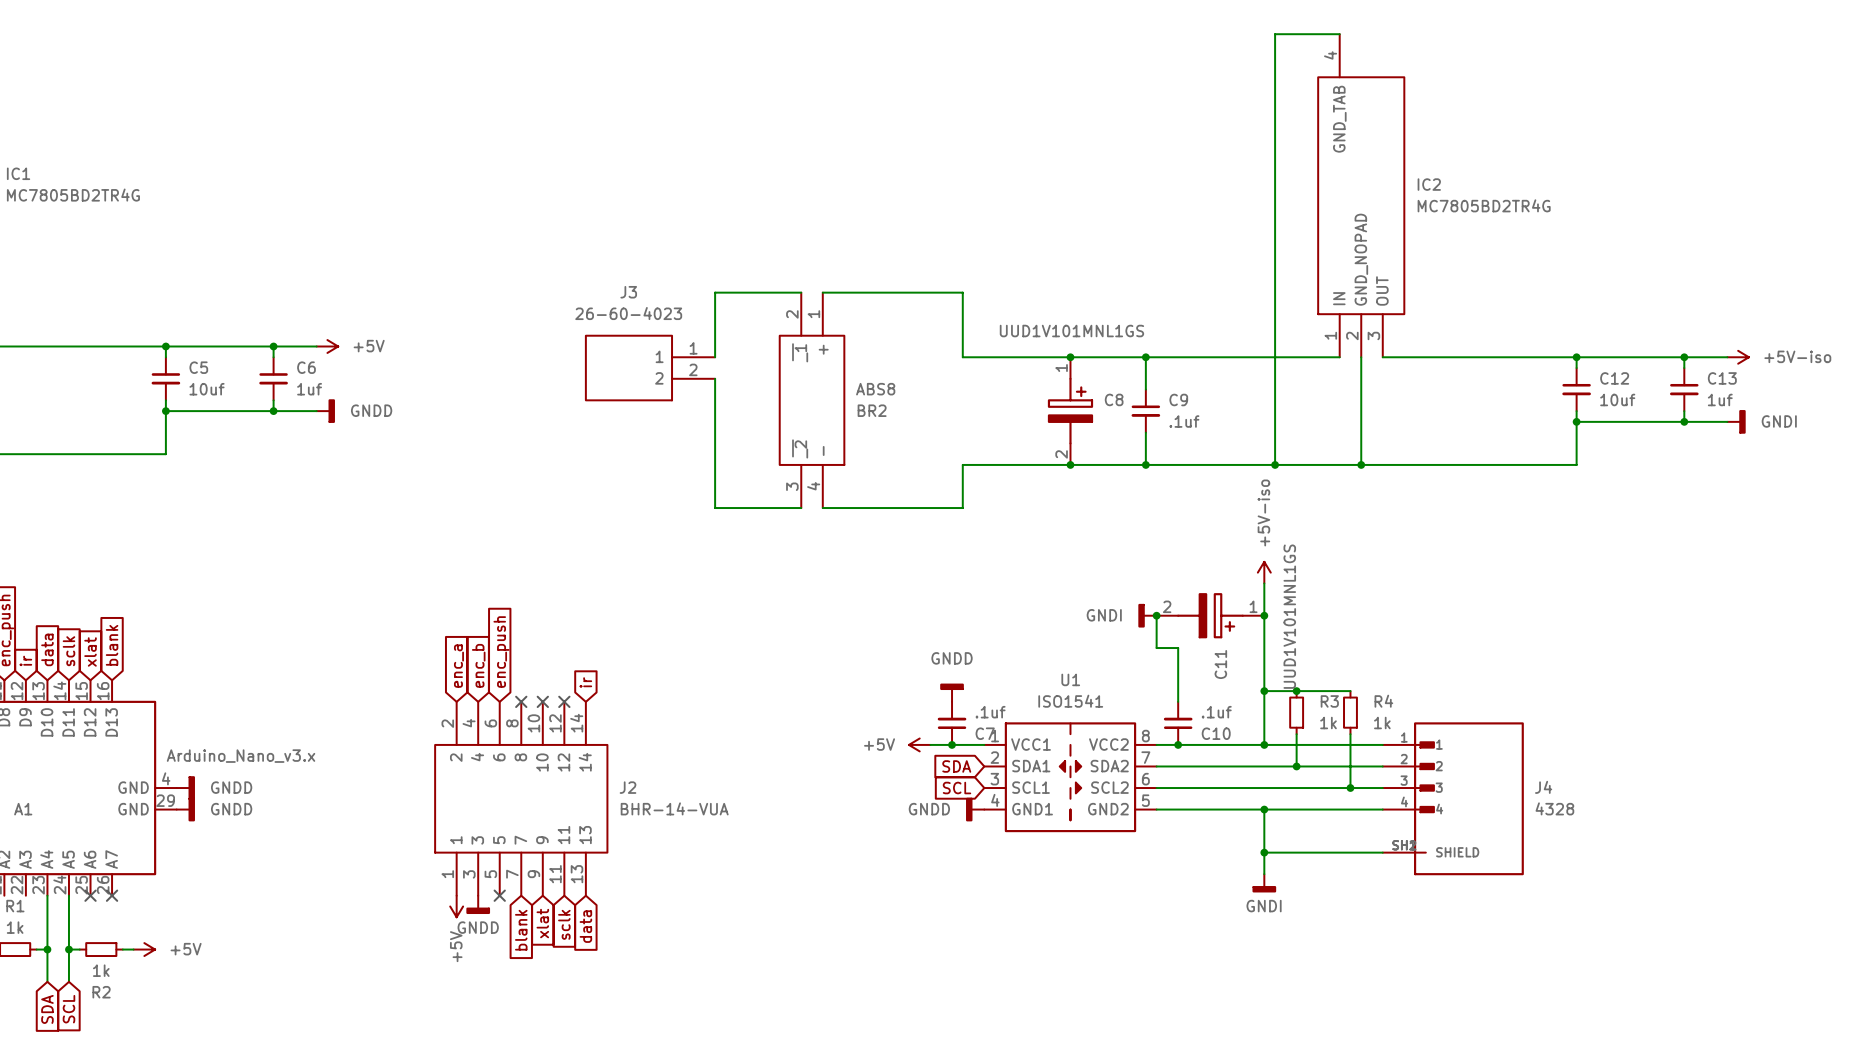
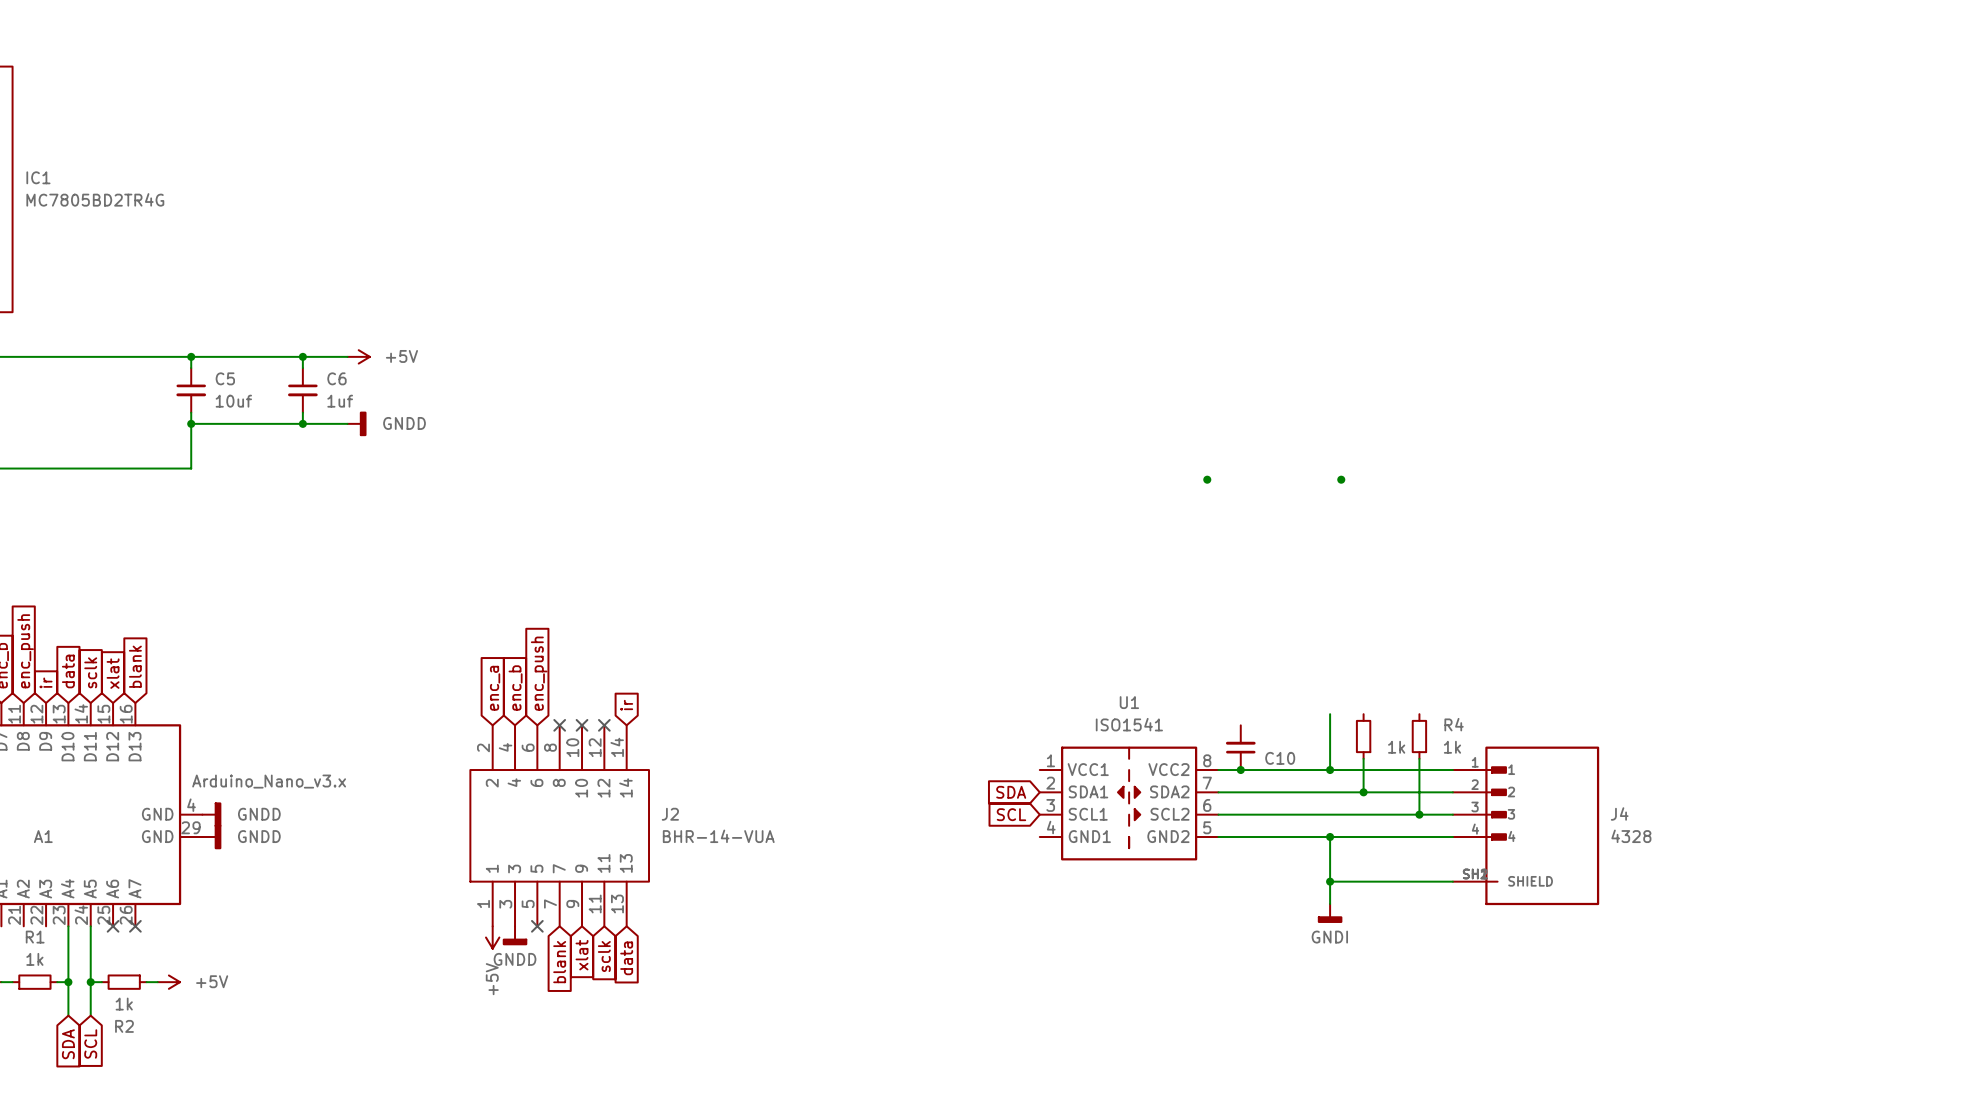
wire: (1339, 34) (1275, 34) (1275, 464) -> none
IC2: MC7805BD2TR4G (1361, 195) -> none
wire: (801, 292) (715, 292) (715, 357) -> none
wire: (822, 292) (962, 292) (962, 357) (1339, 357) -> none
junction: (1070, 357) -> none
wire: (1145, 357) (1145, 389) -> none
junction: (1145, 357) -> none
wire: (1361, 357) (1361, 464) -> none
wire: (1382, 357) (1727, 357) -> none
wire: (1576, 357) (1576, 368) -> none
junction: (1576, 357) -> none
wire: (1684, 357) (1684, 368) -> none
junction: (1684, 357) -> none
power symbol: +5V-iso (1738, 357) -> none
J3: 26-60-4023 (650, 368) -> none
wire: (715, 378) (715, 508) (801, 508) -> none
C12: 10uf (1576, 389) -> none
C13: 1uf (1684, 389) -> none
BR2: ABS8 (812, 400) -> none
C8: UUD1V101MNL1GS (1070, 411) -> none
C9: .1uf (1145, 411) -> none
wire: (1576, 411) (1576, 464) (962, 464) (962, 508) (822, 508) -> none
wire: (1684, 411) (1684, 421) -> none
wire: (1576, 421) (1727, 421) -> none
junction: (1576, 421) -> none
junction: (1684, 421) -> none
power symbol: GNDI (1736, 421) -> none
wire: (1145, 432) (1145, 464) -> none
junction: (1070, 464) -> none
junction: (1361, 464) -> none
power symbol: +5V-iso (1264, 572) -> none
wire: (1264, 583) (1264, 691) (1350, 691) -> none
power symbol: GNDI (1147, 615) -> none
wire: (1156, 615) (1156, 648) (1178, 648) (1178, 701) -> none
junction: (1156, 615) -> none
C11: UUD1V101MNL1GS (1210, 615) -> none
junction: (1264, 615) -> none
junction: (1264, 691) -> none
junction: (1296, 691) -> none
power symbol: GNDD (952, 692) -> none
R3 name: R3 (1329, 701) -> none
C10 value: .1uf (1216, 712) -> none
C7: .1uf (952, 723) -> none
power symbol: +5V (919, 744) -> none
wire: (930, 744) (984, 744) -> none
junction: (952, 744) -> none
power symbol: GNDD (975, 809) -> none

